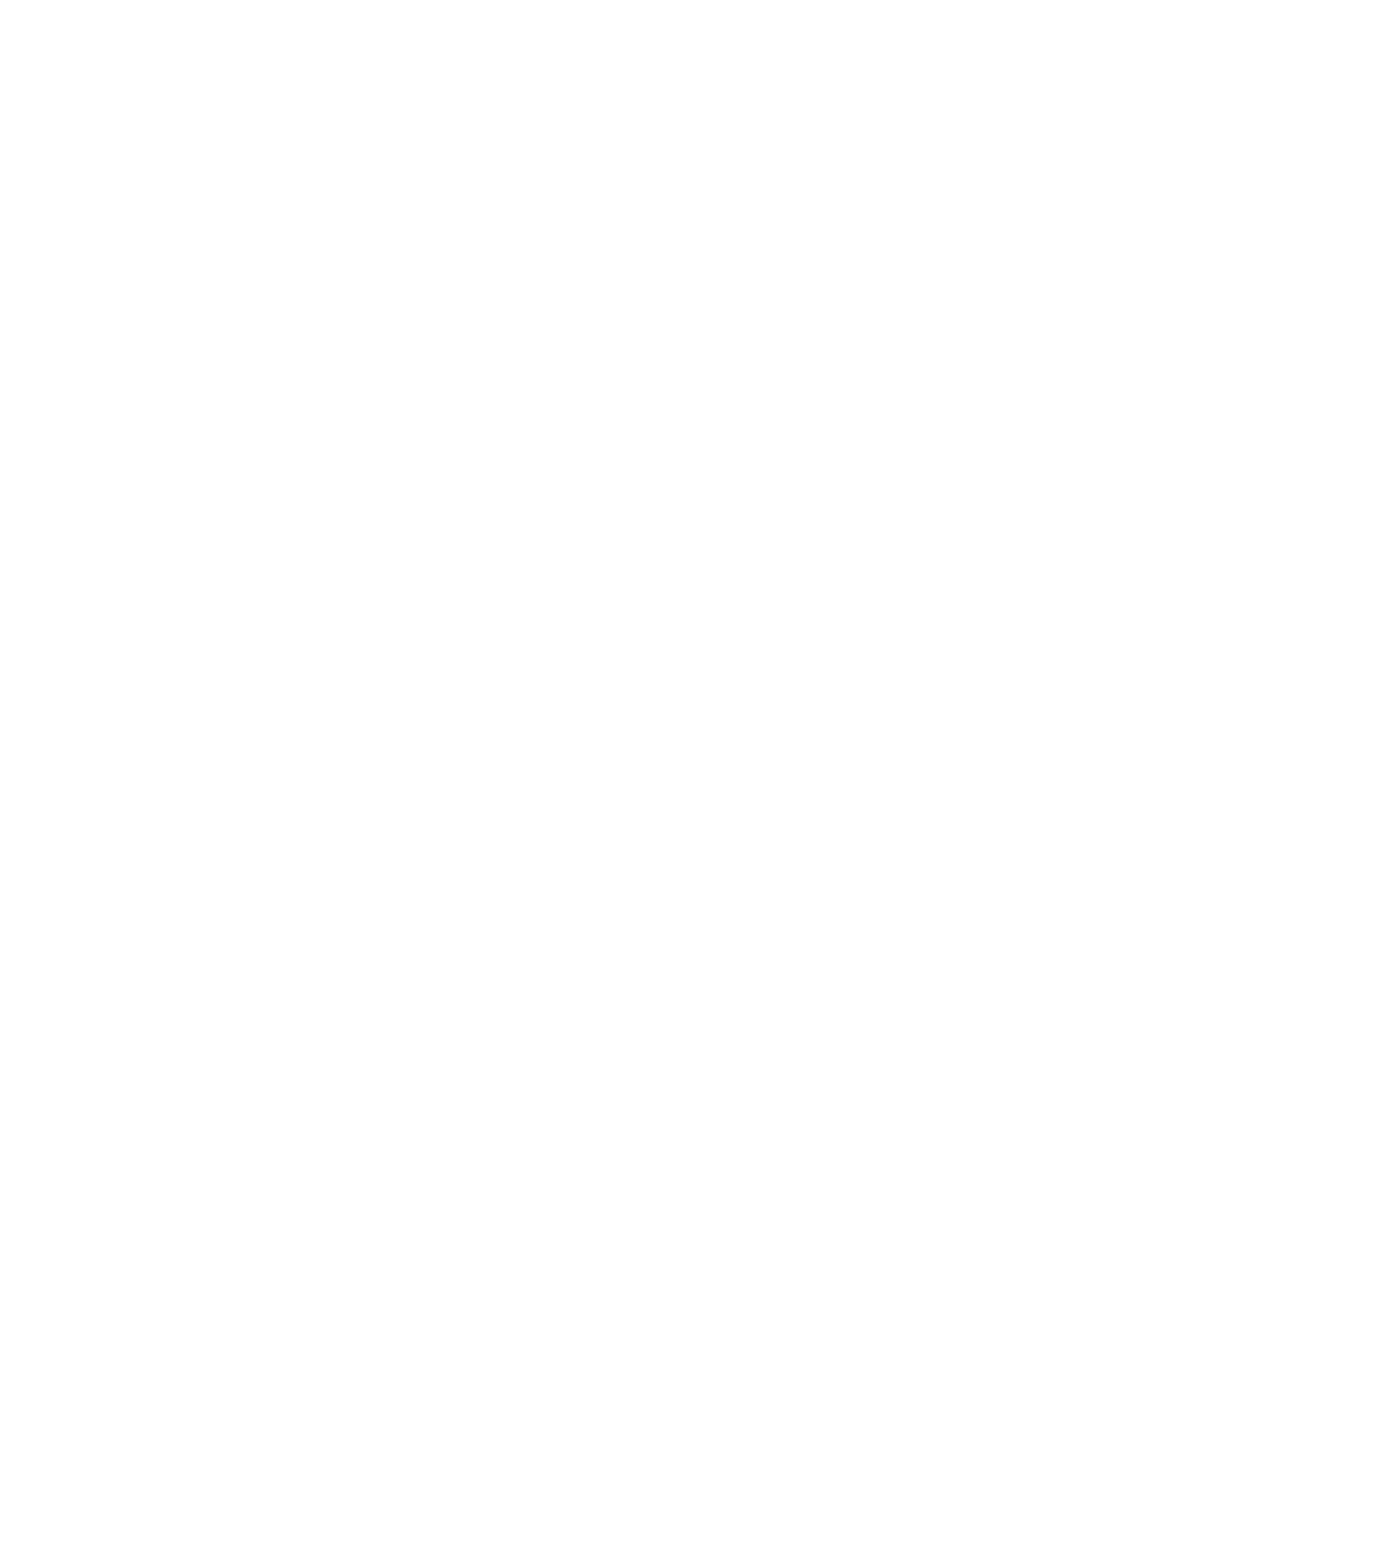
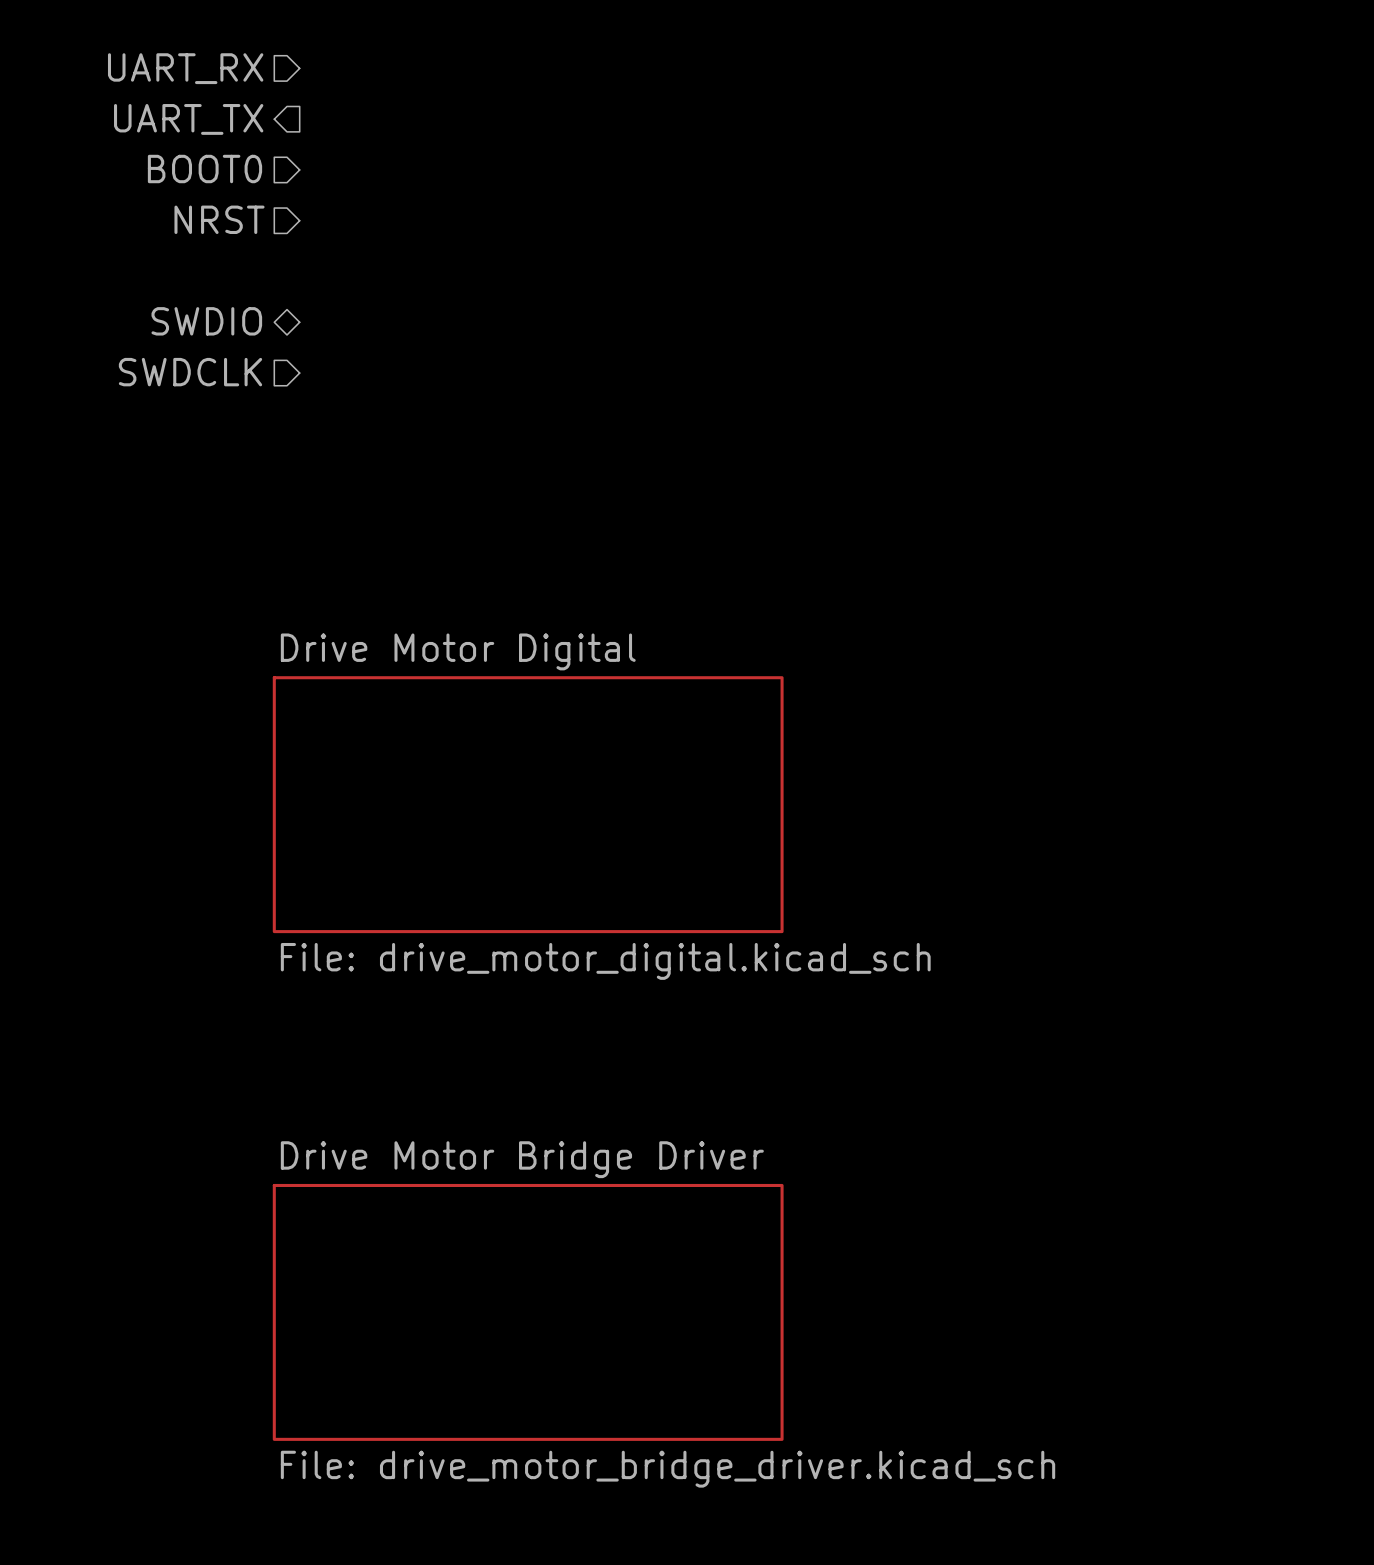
hierarchical label: none -> UART_RX (185, 68)
hierarchical label: none -> UART_TX (188, 119)
hierarchical label: none -> BOOT0 (204, 169)
hierarchical label: none -> NRST (219, 219)
hierarchical label: none -> SWDIO (206, 321)
hierarchical label: none -> SWDCLK (190, 372)
sheet Drive Motor Digital: none -> File: drive_motor_digital.kicad_sch (528, 804)
sheet Drive Motor Bridge Driver: none -> File: drive_motor_bridge_driver.kicad_sch (528, 1312)

